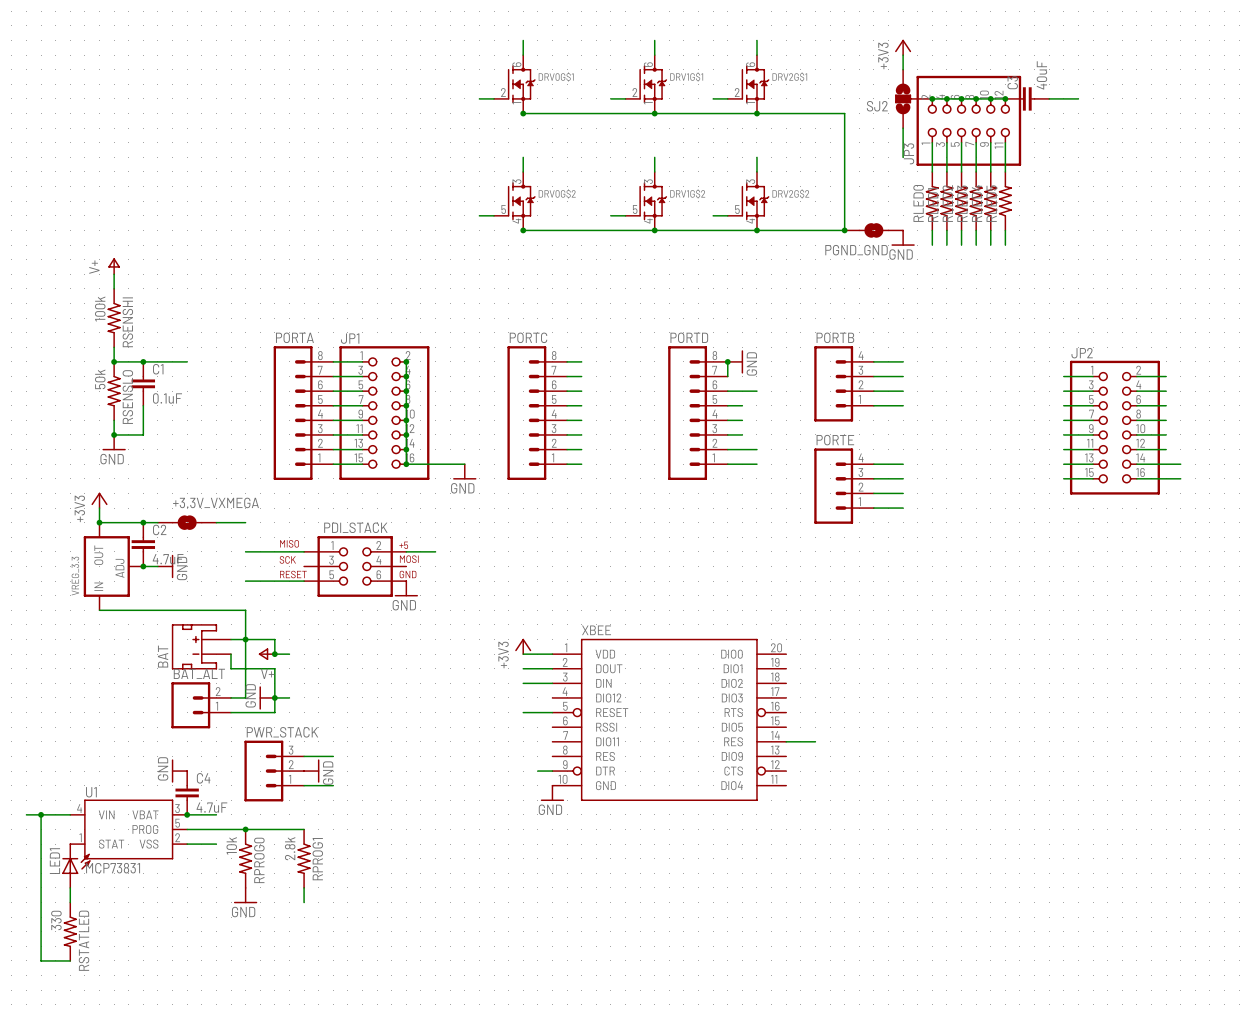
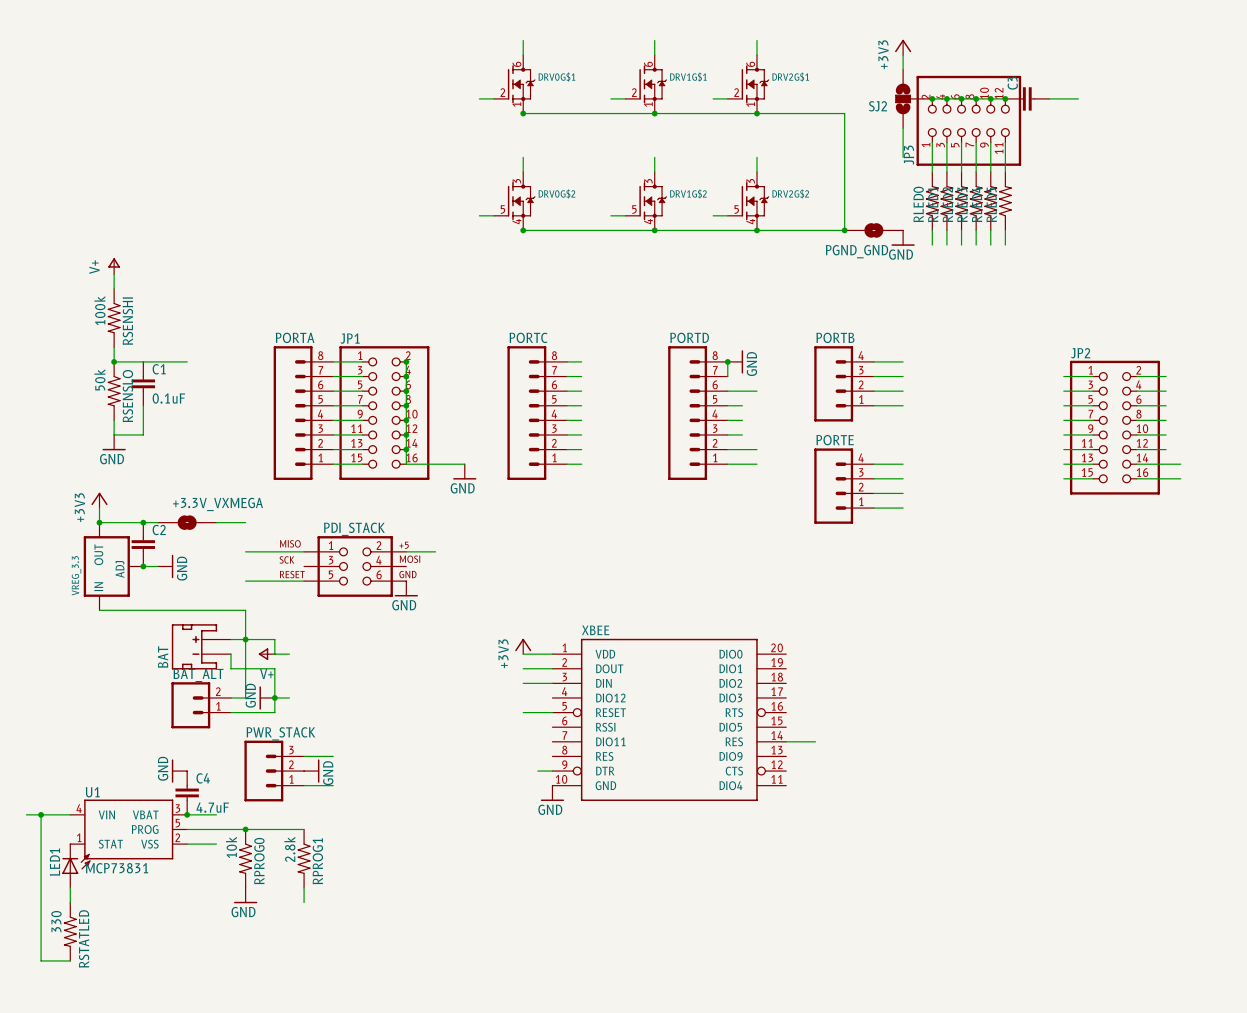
C3 value: 40uF (1041, 75) -> none
junction: (143, 361) -> none
junction: (114, 434) -> none
junction: (406, 464) -> none
C2 value: 4.7uF (168, 559) -> none
junction: (274, 654) -> none

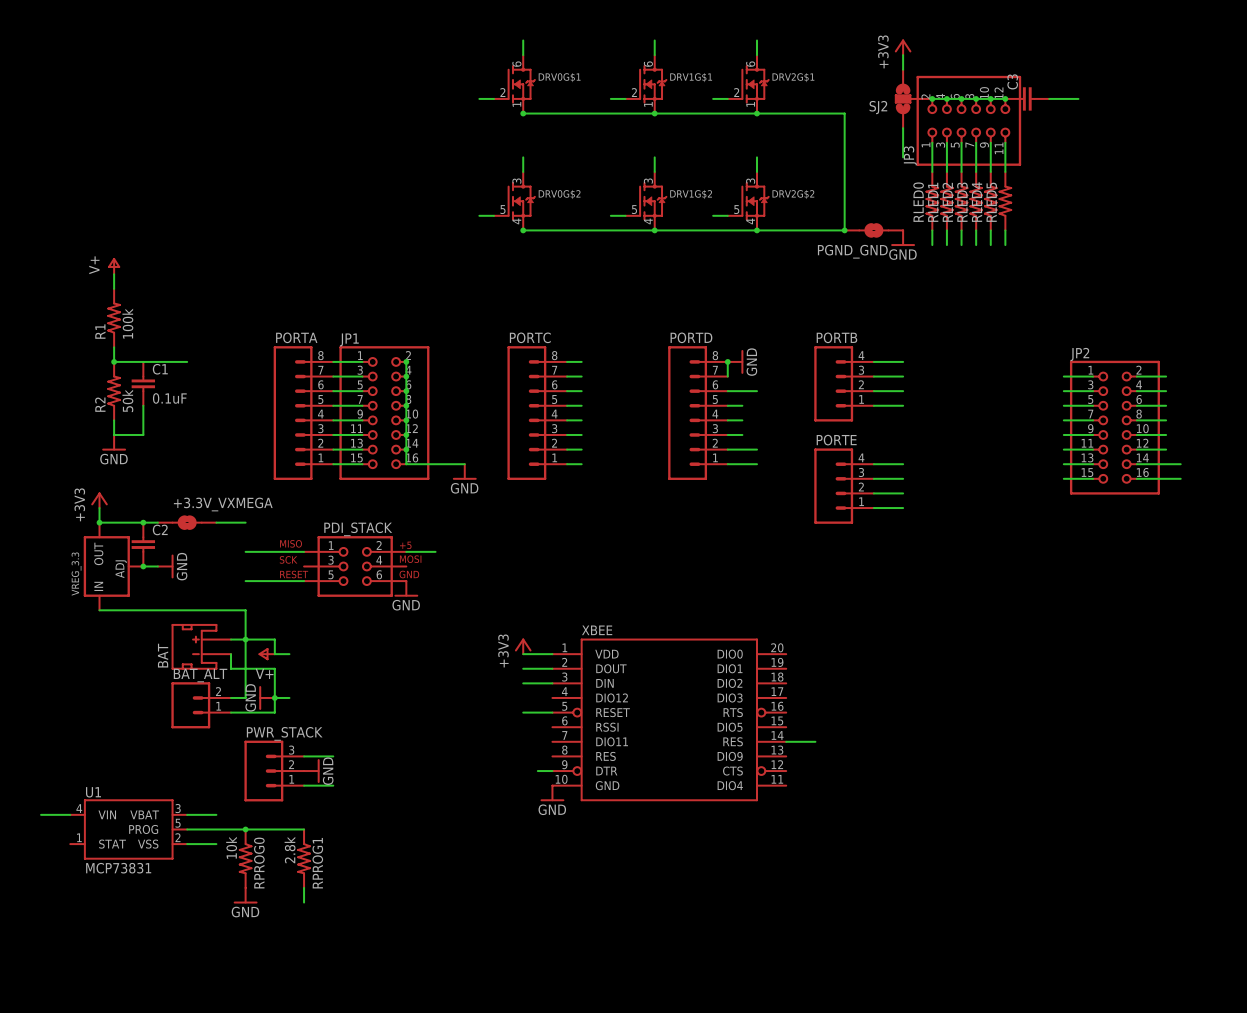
RSENSHI: 100k (114, 318) -> none
R1: none -> 100k (114, 318)
RSENSLO: 50k (114, 391) -> none
R2: none -> 50k (114, 391)
power symbol: GND (179, 771) -> none
C4: 4.7uF (187, 792) -> none
wire: (26, 814) (41, 814) (41, 960) (70, 960) -> none
junction: (41, 814) -> none
junction: (187, 814) -> none
LED1: (76, 866) -> none
wire: (70, 887) (70, 902) -> none
RSTATLED: 330 (70, 931) -> none

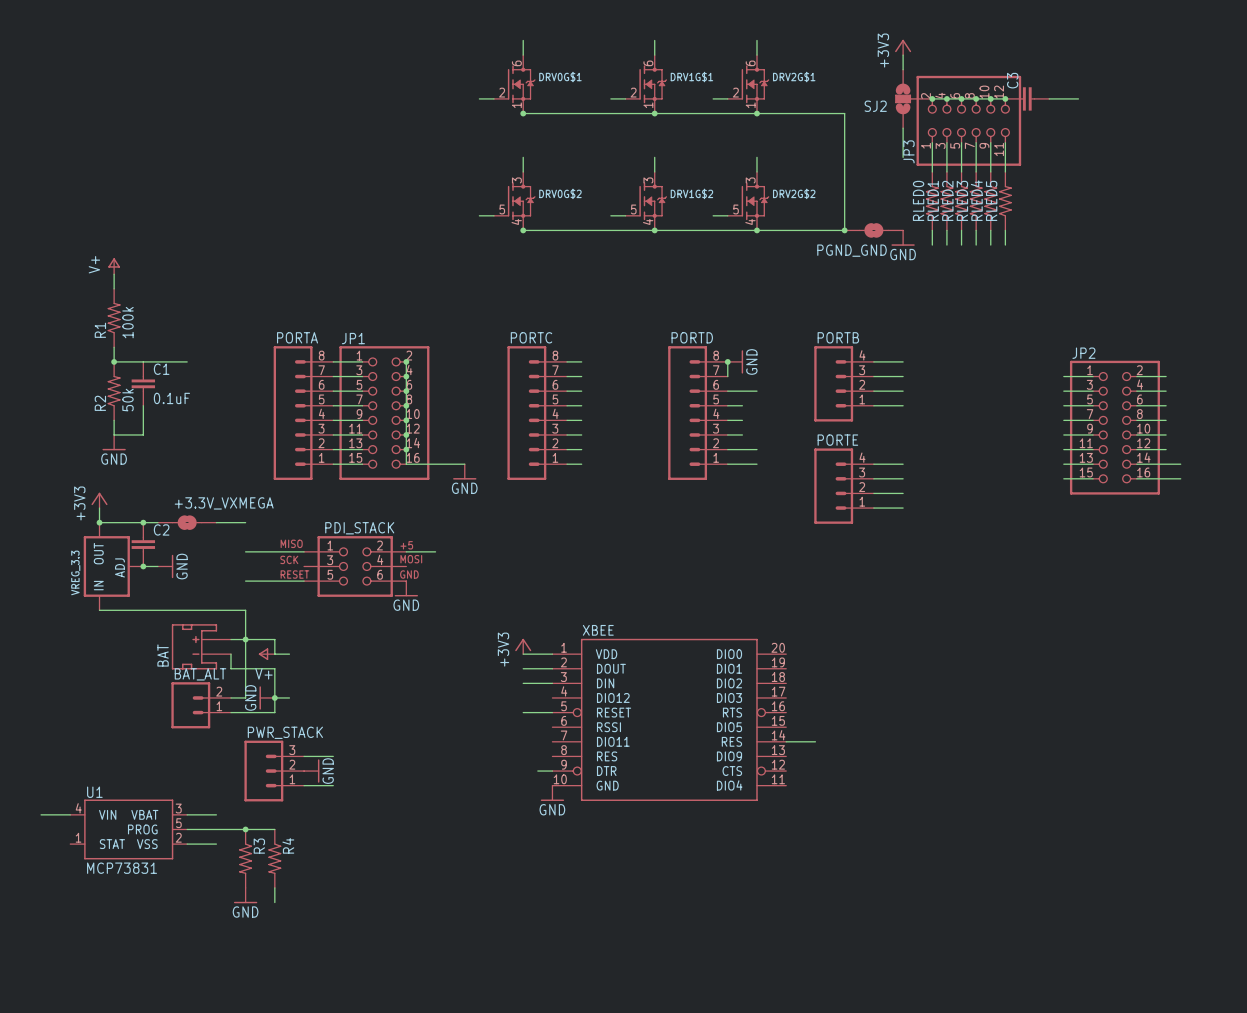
wire: (274, 829) (304, 829) -> none
RPROG0 value: 10k (231, 847) -> none
R4: none -> (274, 858)
RPROG1: 2.8k (304, 858) -> none
RPROG0 name: RPROG0 (259, 863) -> R3 (259, 846)
wire: (304, 887) (304, 902) -> (274, 887) (274, 902)

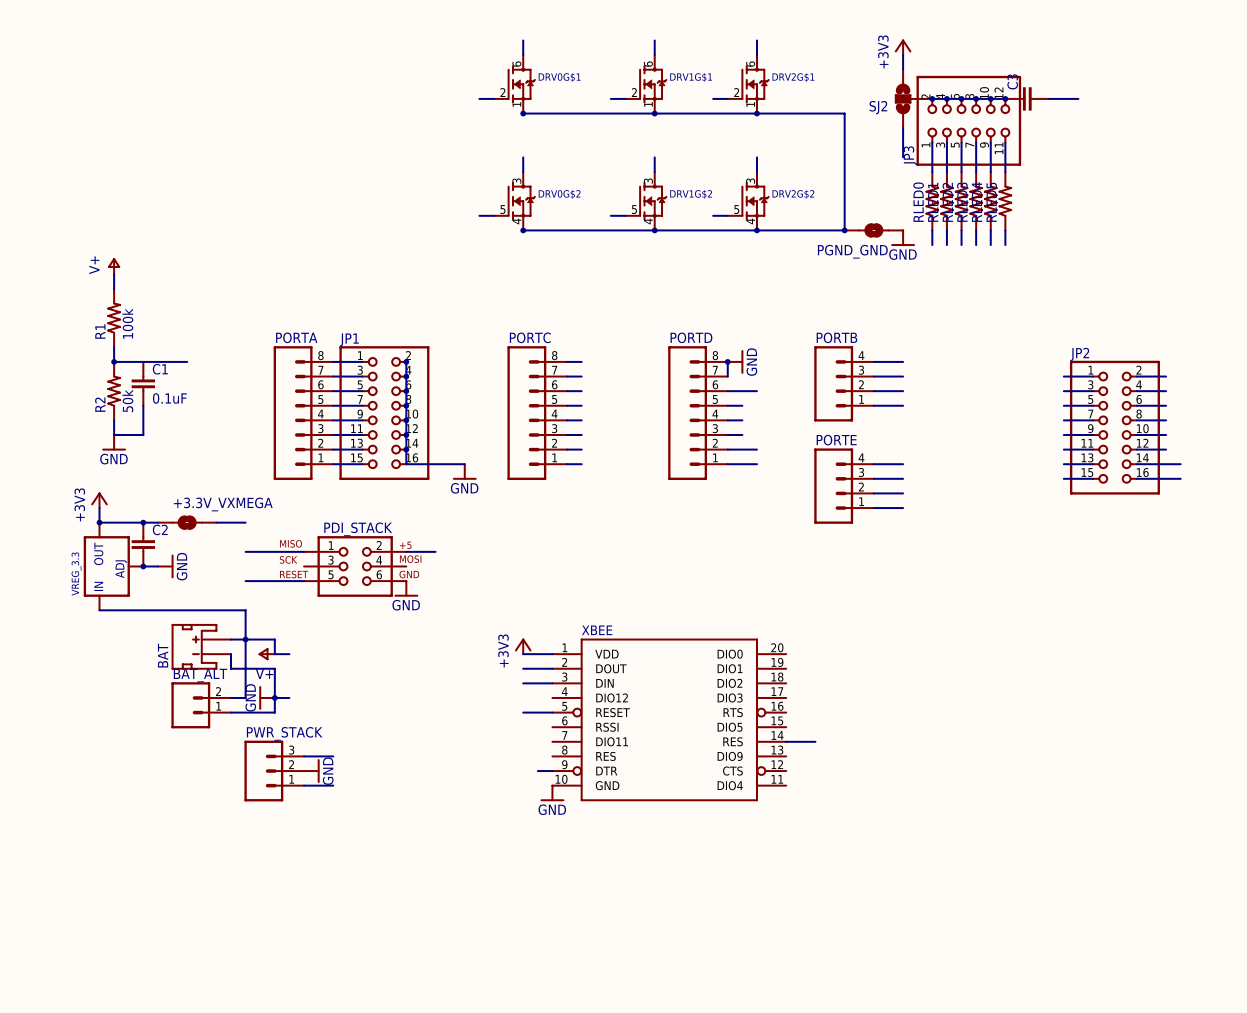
wire: (41, 814) (70, 814) -> none
wire: (187, 814) (216, 814) -> none
U1: MCP73831 (128, 829) -> none
wire: (187, 829) (274, 829) -> none
junction: (245, 829) -> none
wire: (187, 844) (216, 844) -> none
R3: (245, 858) -> none
R4: (274, 858) -> none
wire: (274, 887) (274, 902) -> none
power symbol: GND (245, 895) -> none

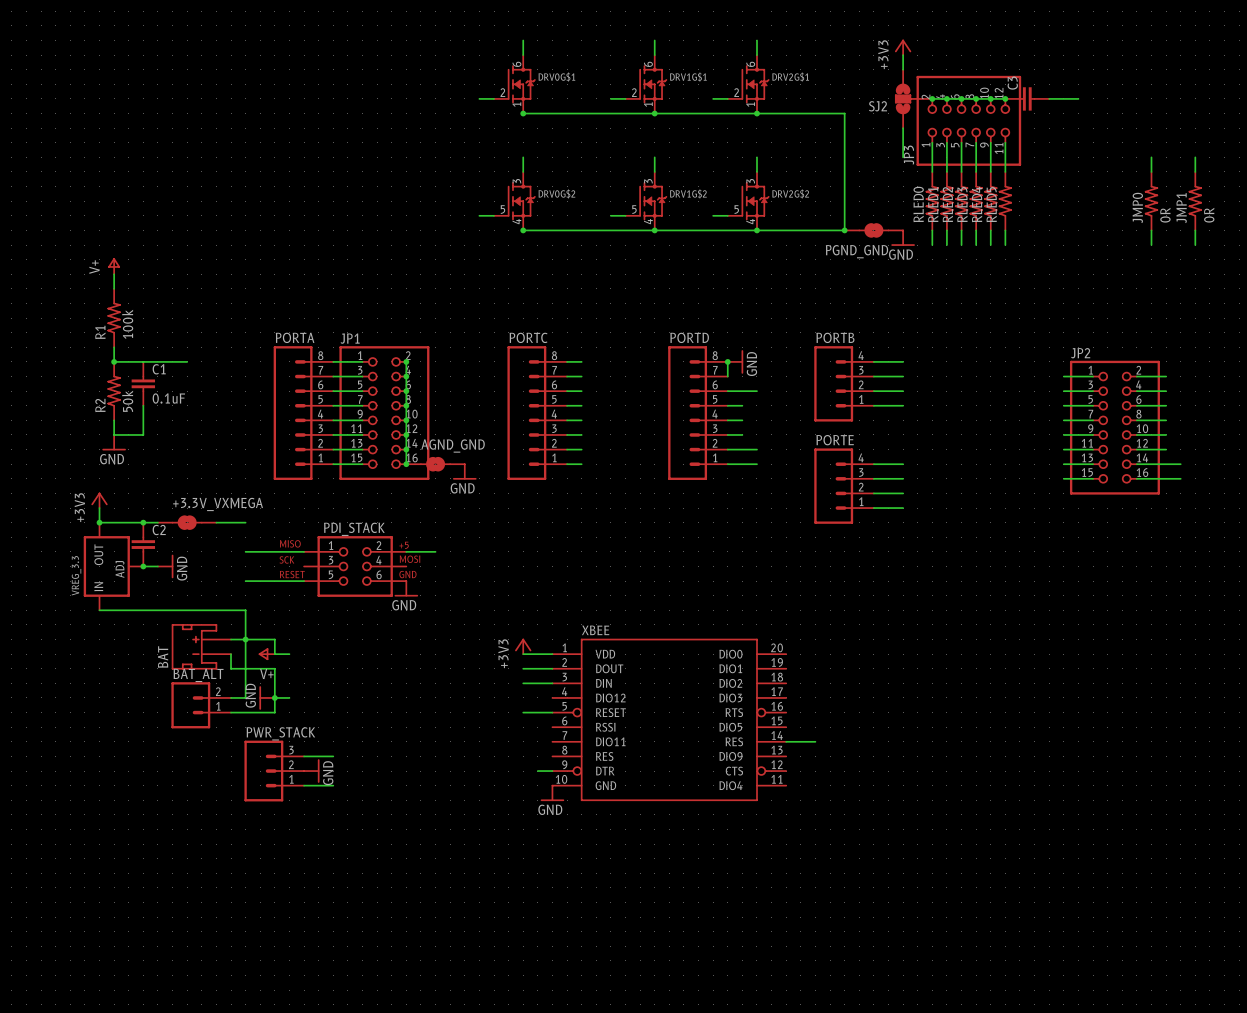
wire: none -> (1151, 157) (1151, 171)
wire: none -> (1195, 157) (1195, 171)
JMP0: none -> 0R (1151, 201)
JMP1: none -> 0R (1195, 201)
wire: none -> (1151, 230) (1151, 245)
wire: none -> (1195, 230) (1195, 245)
junction: none -> (406, 464)
AGND_GND: none -> (435, 464)

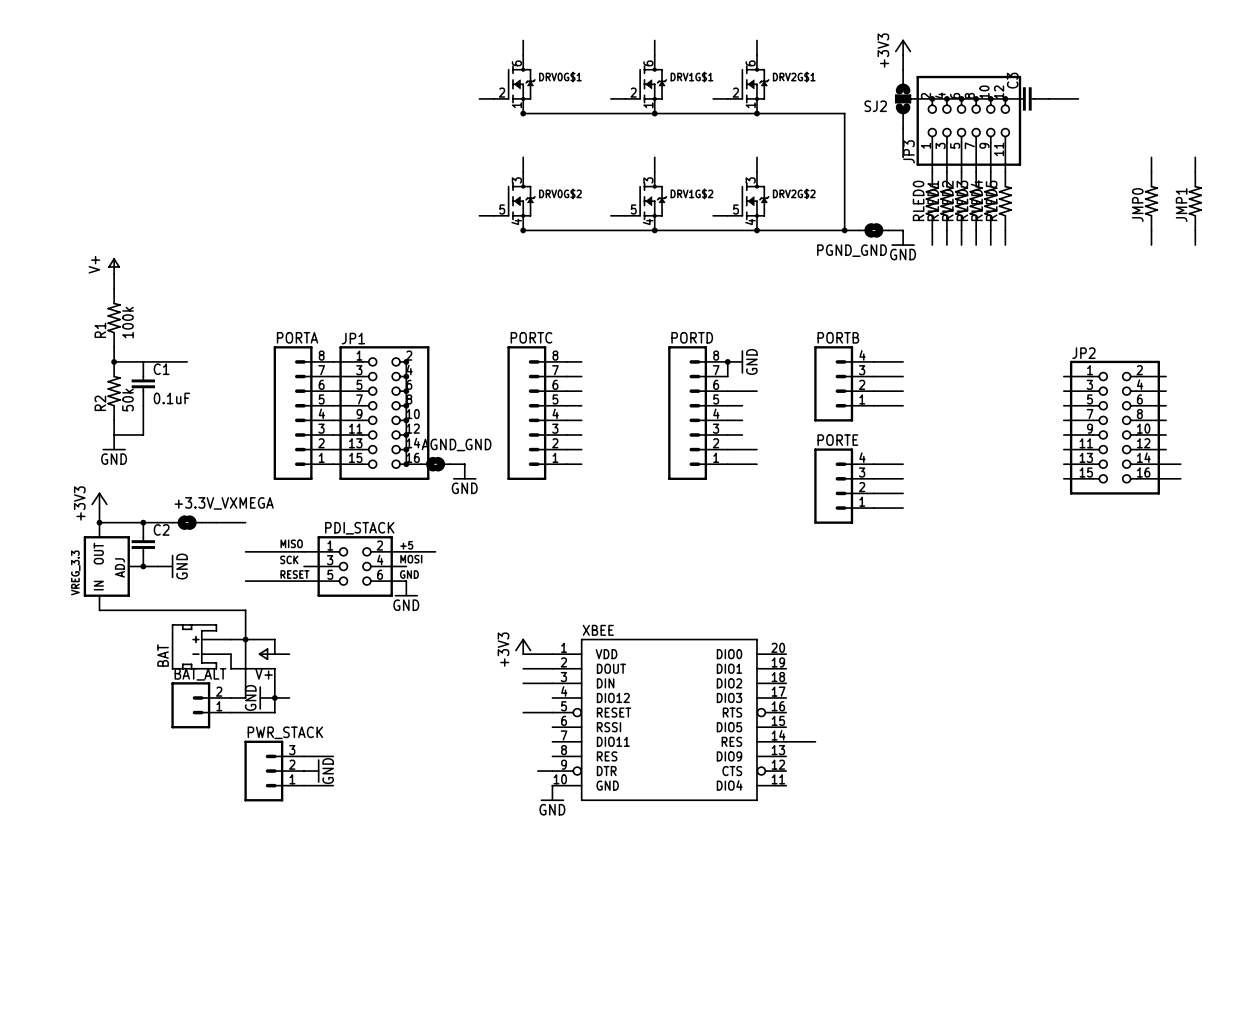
JMP0 value: 0R (1165, 215) -> none
JMP1 value: 0R (1209, 215) -> none

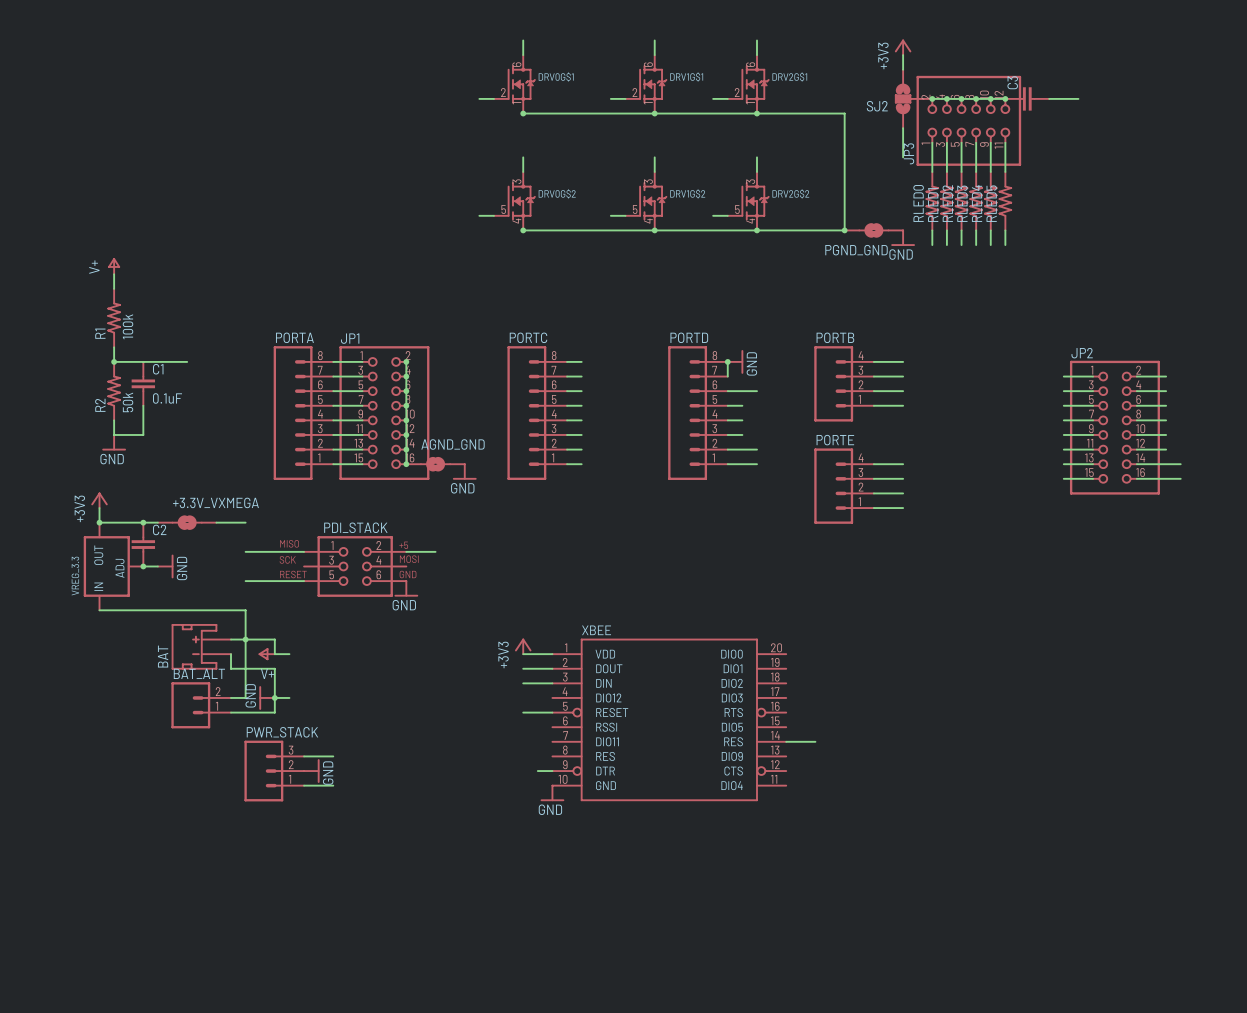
wire: (1151, 157) (1151, 171) -> none
wire: (1195, 157) (1195, 171) -> none
JMP0: (1151, 201) -> none
JMP1: (1195, 201) -> none
wire: (1151, 230) (1151, 245) -> none
wire: (1195, 230) (1195, 245) -> none

